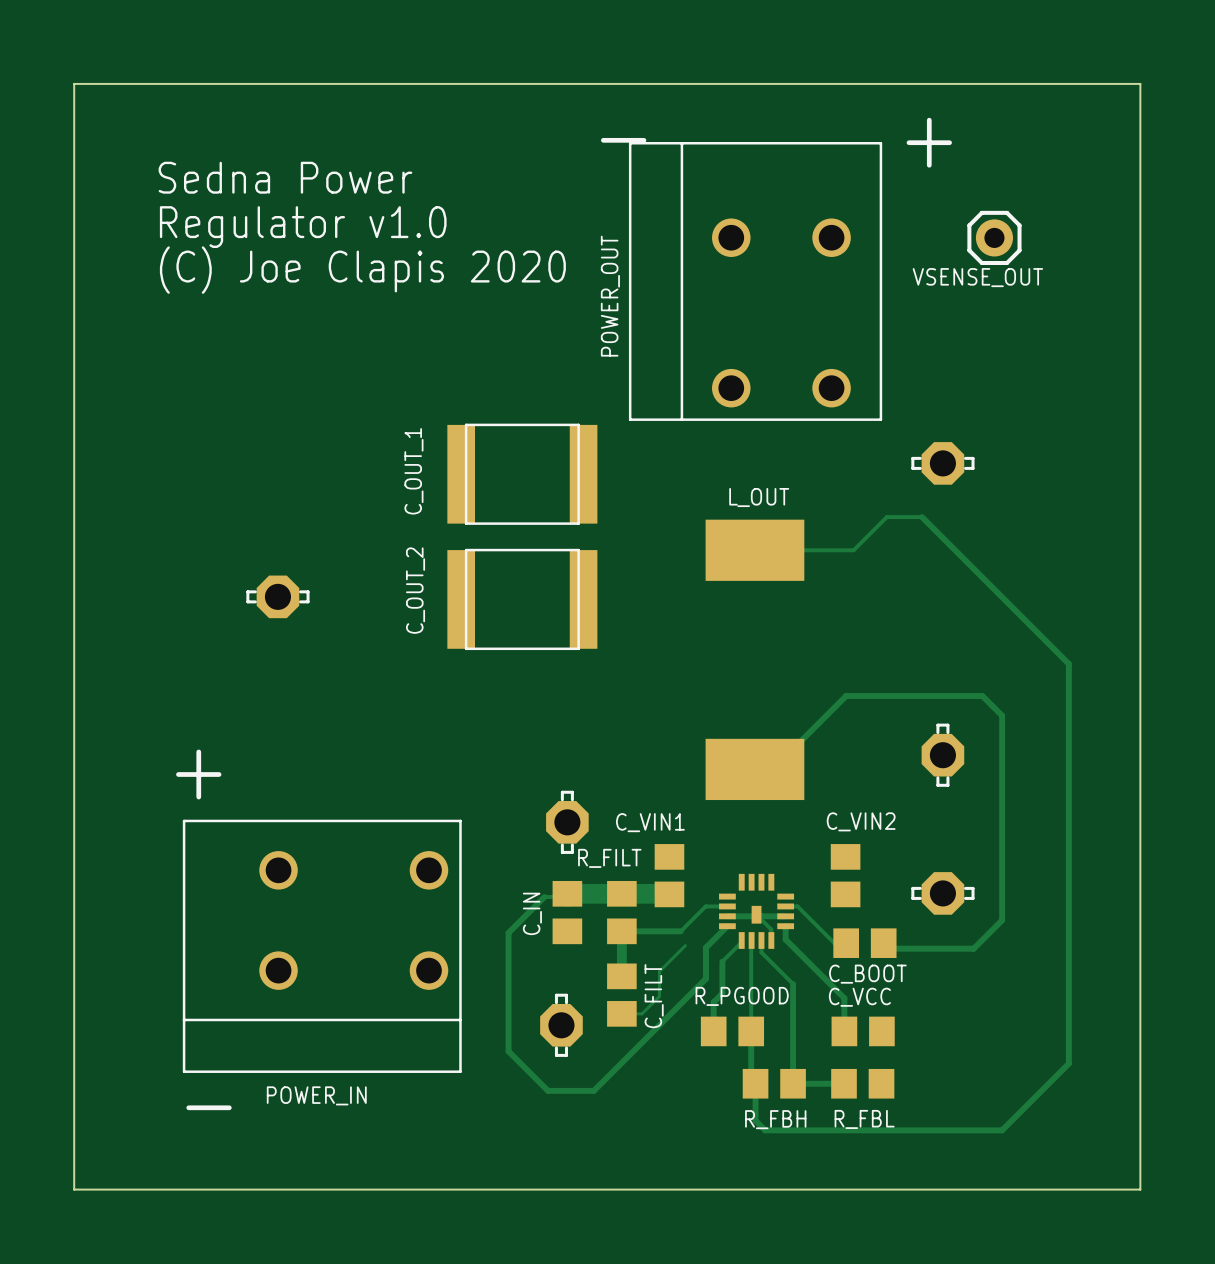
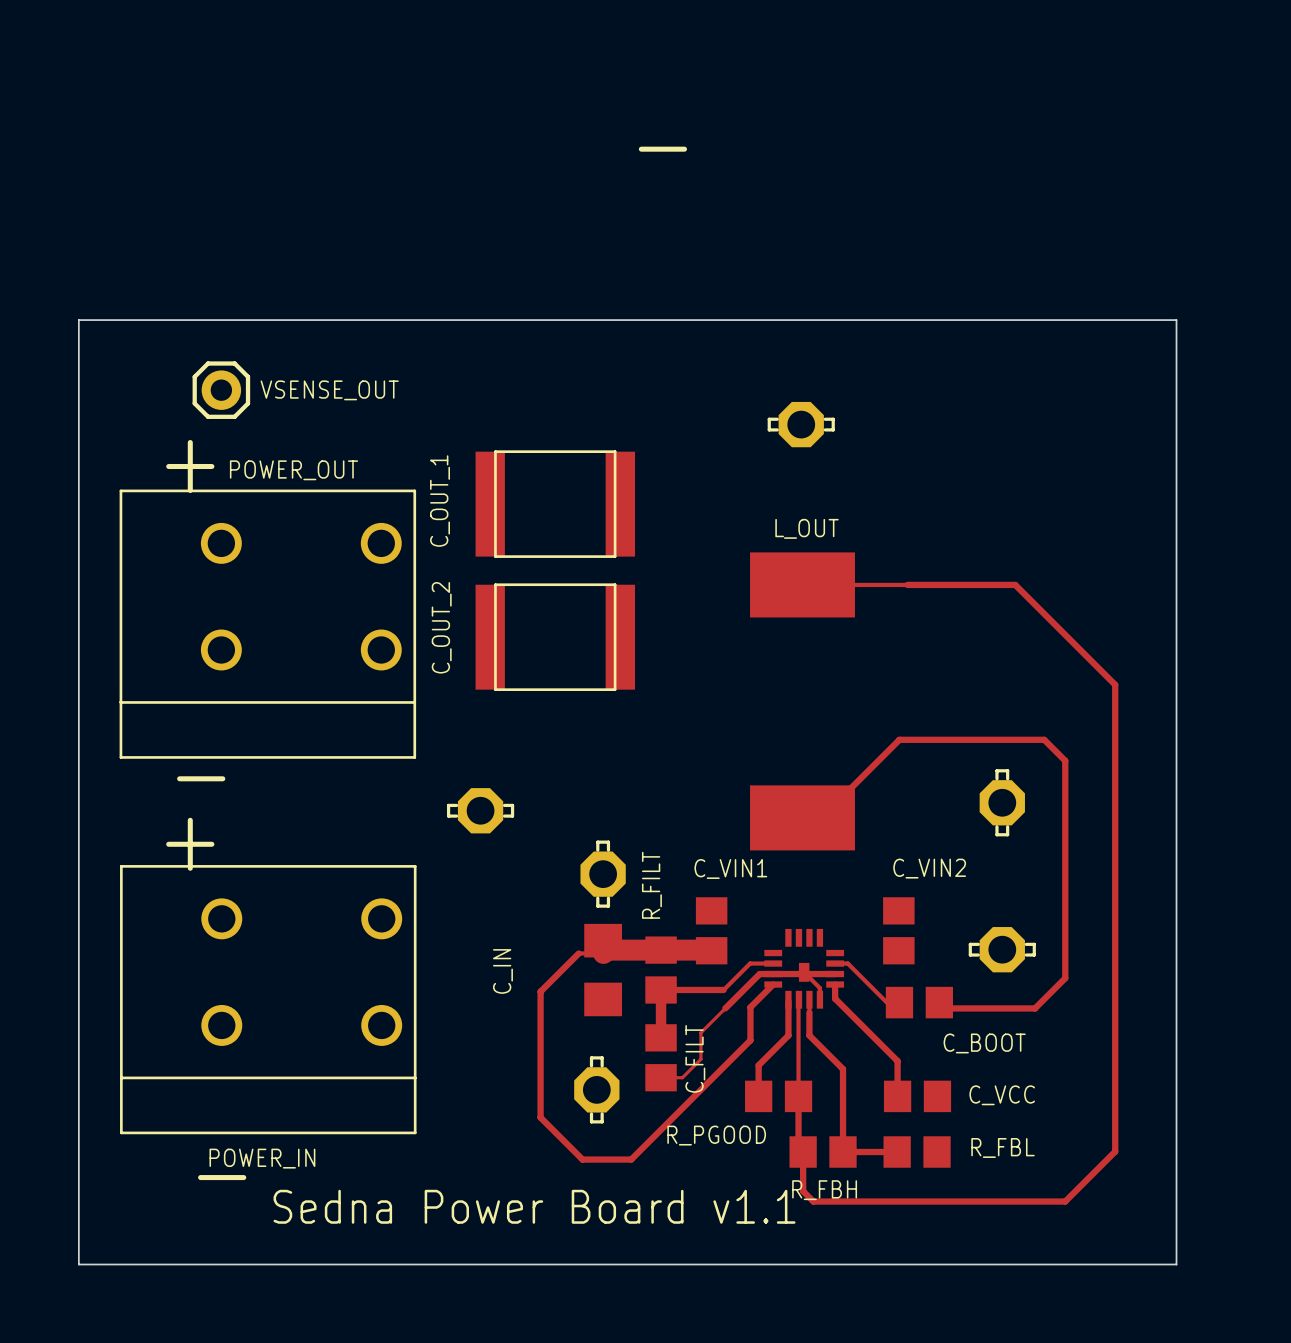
text: + (929, 142) -> none
text: Sedna Power (285, 177) -> none
text: Regulator v1.0 (303, 227) -> none
VSENSE_OUT: (994, 237) -> none
text: (C) Joe Clapis 2020 (362, 270) -> none
POWER_OUT: (755, 281) -> none
board edge: (74, 301) (74, 83) (1140, 83) (1140, 1189) (1106, 1189) -> (78, 320) (1176, 320) (1176, 1264)
VSENSE_OUT: none -> (221, 390)
text: none -> + (190, 466)
part position: (942, 463) -> (801, 424)
track: (853, 550) (886, 517) (921, 517) (955, 550) -> (907, 584) (1015, 584)
POWER_OUT: none -> (267, 624)
part position: (277, 596) -> (480, 810)
track: (1049, 644) (1068, 664) (1068, 1063) (1049, 1083) -> (1115, 684) (1115, 1151)
text: none -> - (201, 778)
text position: + (198, 774) -> + (190, 844)
C_VIN2 name position: C_VIN2 (861, 821) -> C_VIN2 (929, 868)
C_VIN1 name position: C_VIN1 (650, 822) -> C_VIN1 (730, 868)
R_FILT name rotation: 0° (609, 858) -> 90° counterclockwise (651, 885)
C_IN footprint: [552, 880, 583, 945] -> [584, 923, 623, 1017]
C_IN name position: C_IN (532, 913) -> C_IN (502, 971)
track: none -> (773, 974) (759, 974) (725, 1008)
track: (741, 942) (722, 961) (722, 993) -> (788, 1001) (788, 1035) (767, 1056)
POWER_IN position: (322, 946) -> (268, 999)
track: (761, 952) (793, 984) (793, 1005) -> (809, 1012) (809, 1035) (843, 1069)
C_BOOT name position: C_BOOT (867, 974) -> C_BOOT (984, 1043)
R_PGOOD name position: R_PGOOD (742, 996) -> R_PGOOD (716, 1135)
C_VCC name position: C_VCC (859, 997) -> C_VCC (1002, 1095)
R_FBL name position: R_FBL (864, 1119) -> R_FBL (1003, 1147)
text: none -> Sedna Power Board v1.1 (534, 1206)

